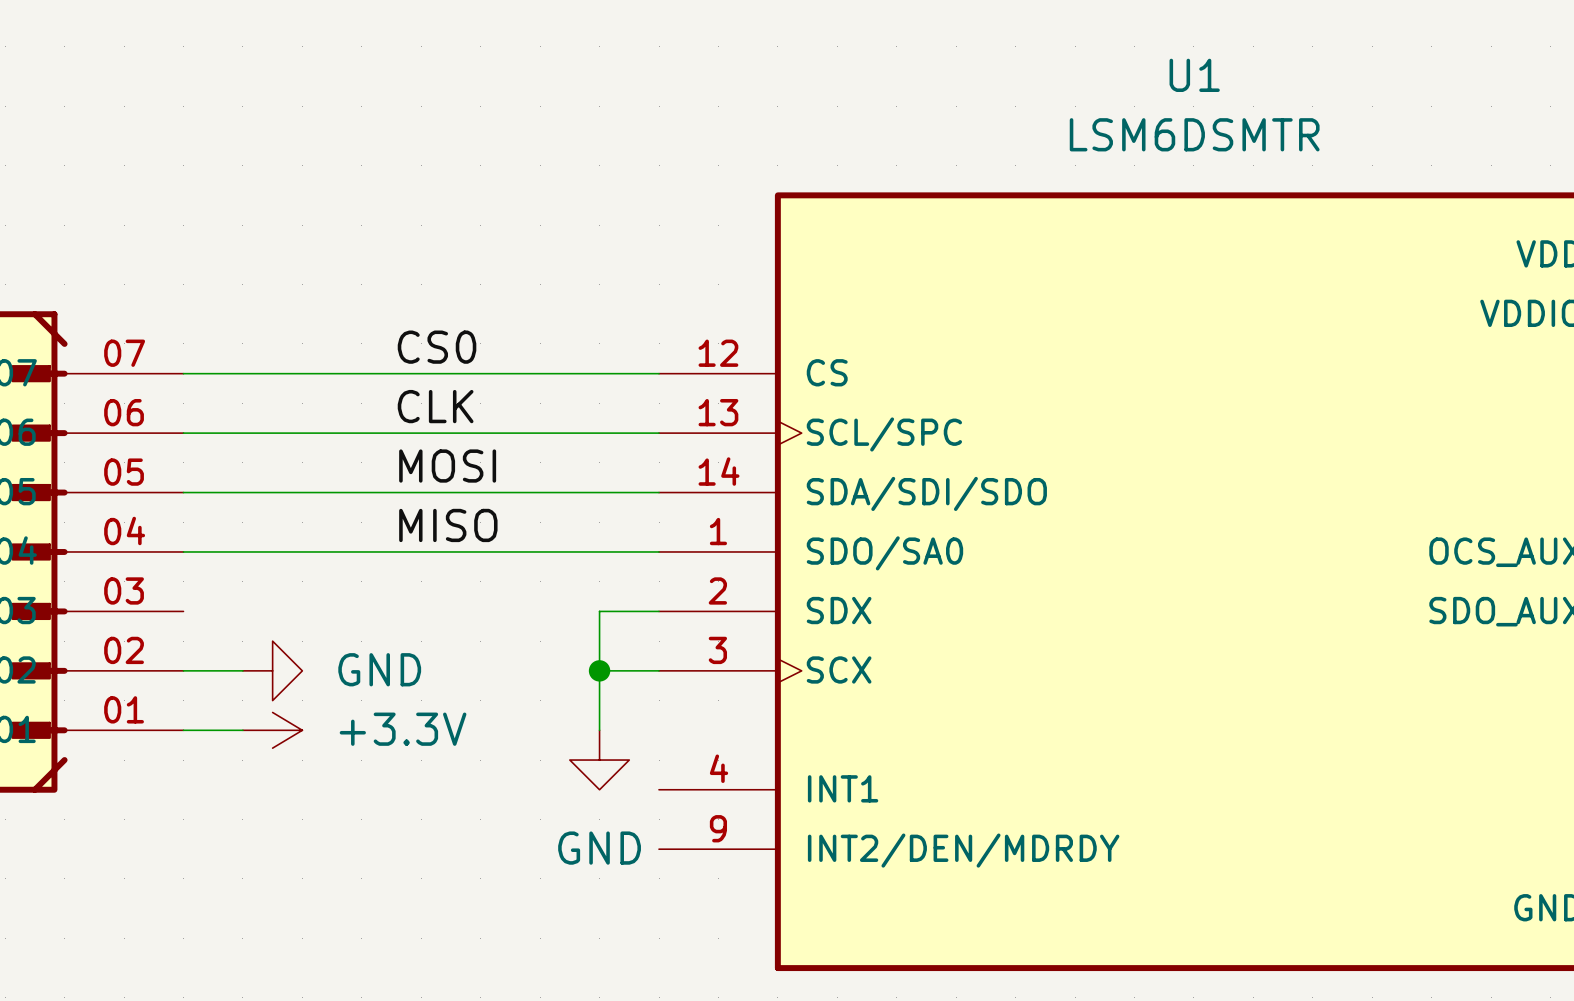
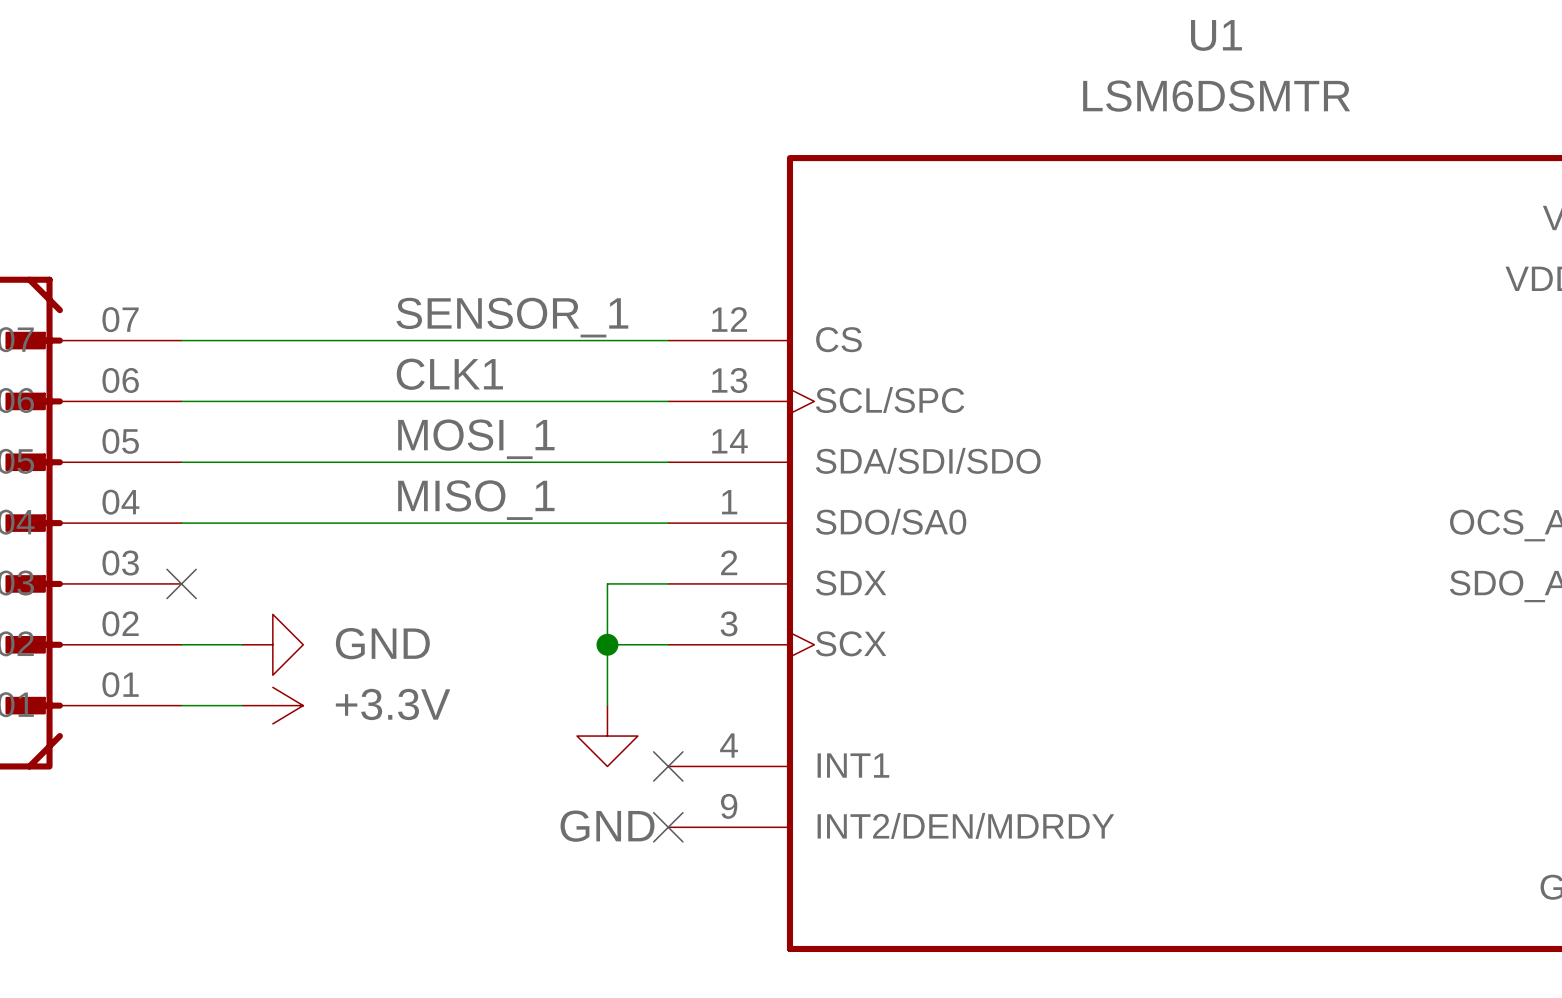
label: CS0 (437, 347) -> SENSOR_1 (512, 317)
label: CLK (435, 406) -> CLK1 (449, 374)
label: MOSI (447, 466) -> MOSI_1 (476, 439)
label: MISO (448, 525) -> MISO_1 (476, 500)
no-connect mark: none -> (181, 583)
no-connect mark: none -> (668, 766)
no-connect mark: none -> (668, 827)

